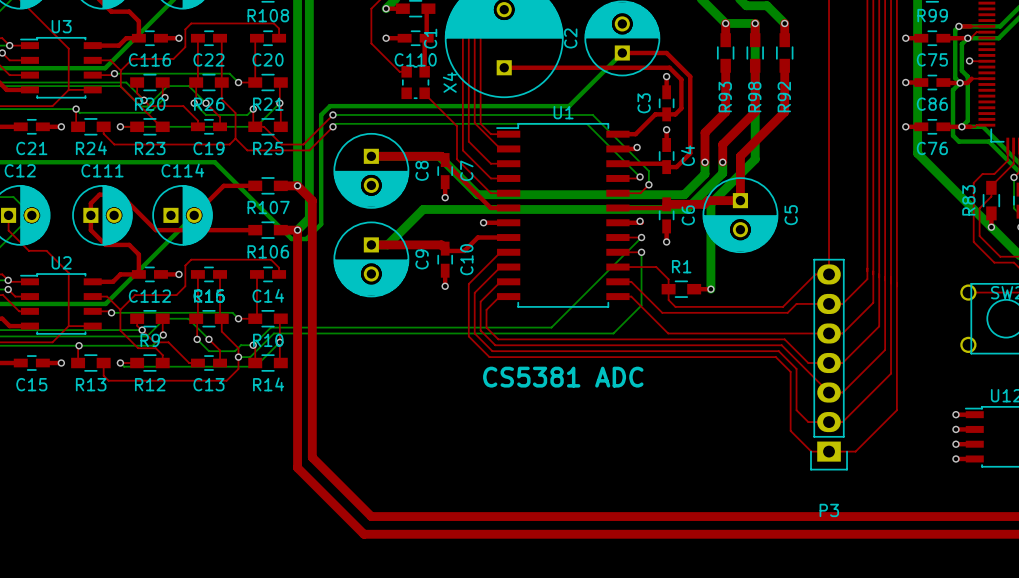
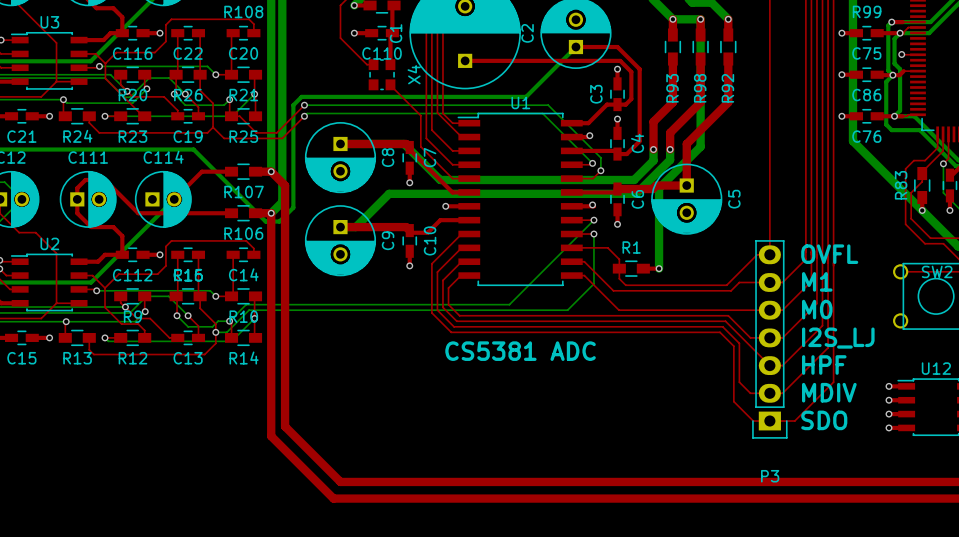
text: none -> OVFL (829, 254)
text: none -> M1 (817, 281)
text: none -> M0 (817, 309)
text: none -> I2S_LJ (838, 338)
text: none -> HPF (824, 364)
text: none -> MDIV (829, 392)
text: none -> SDO (824, 420)

